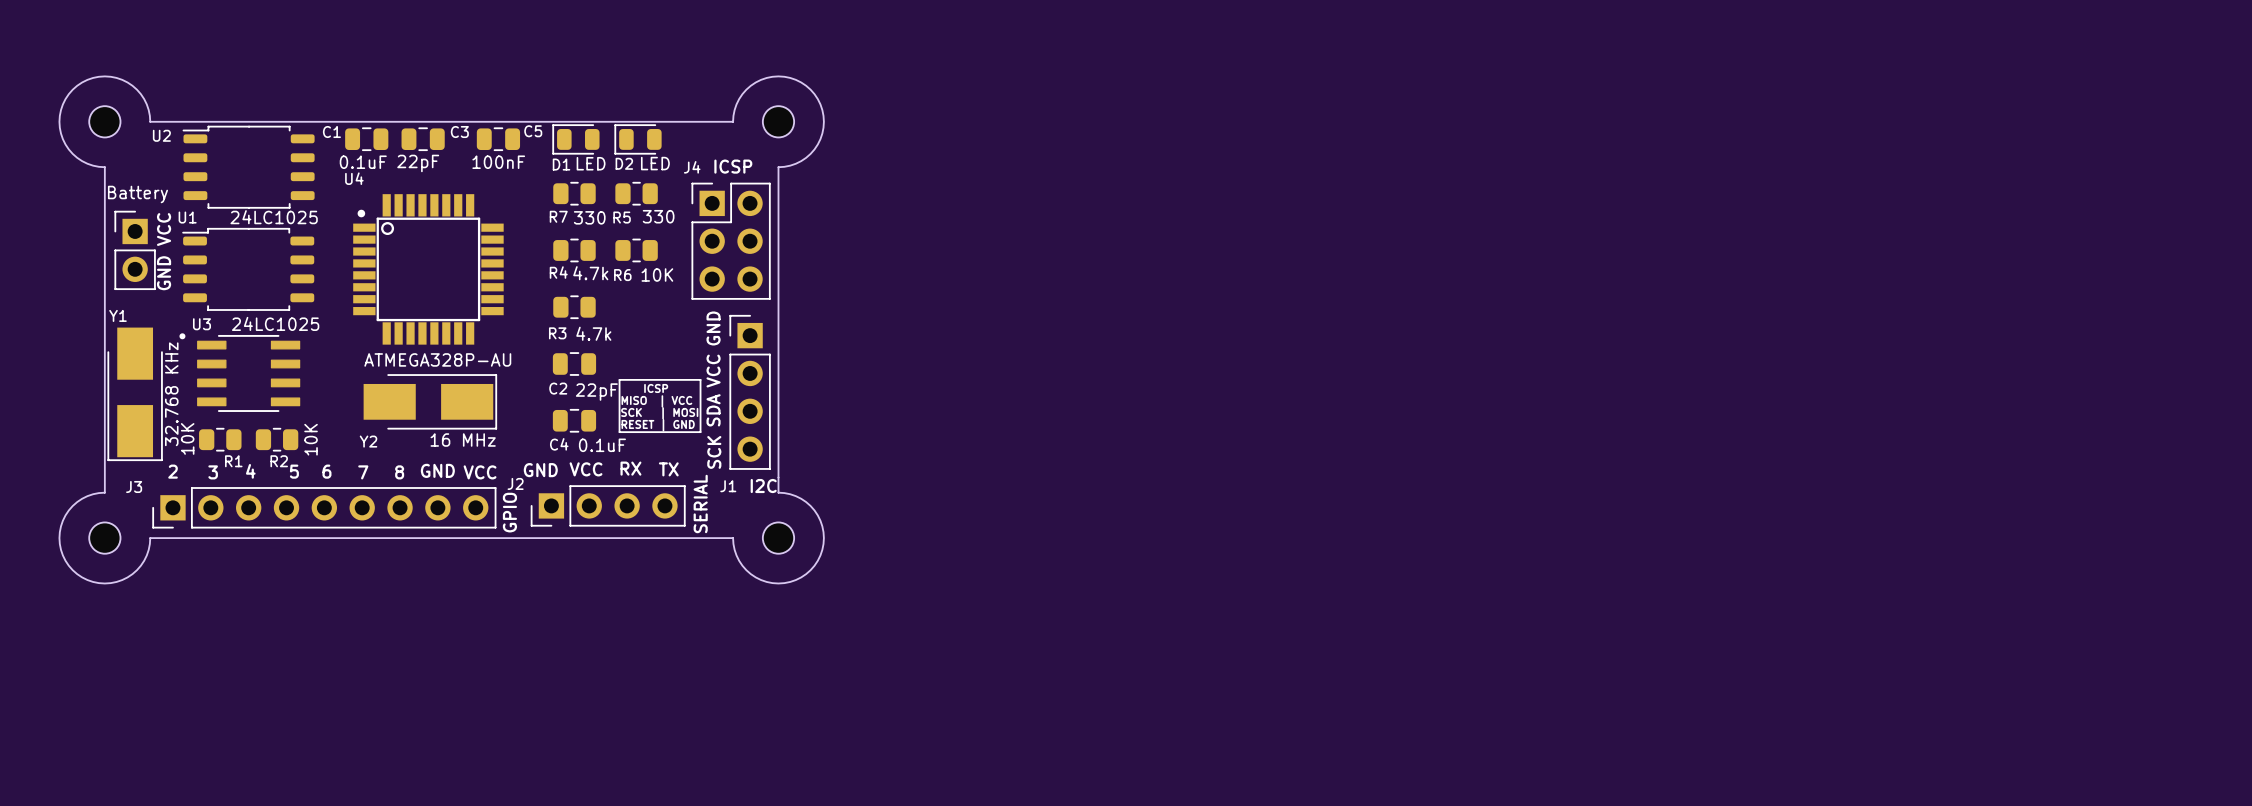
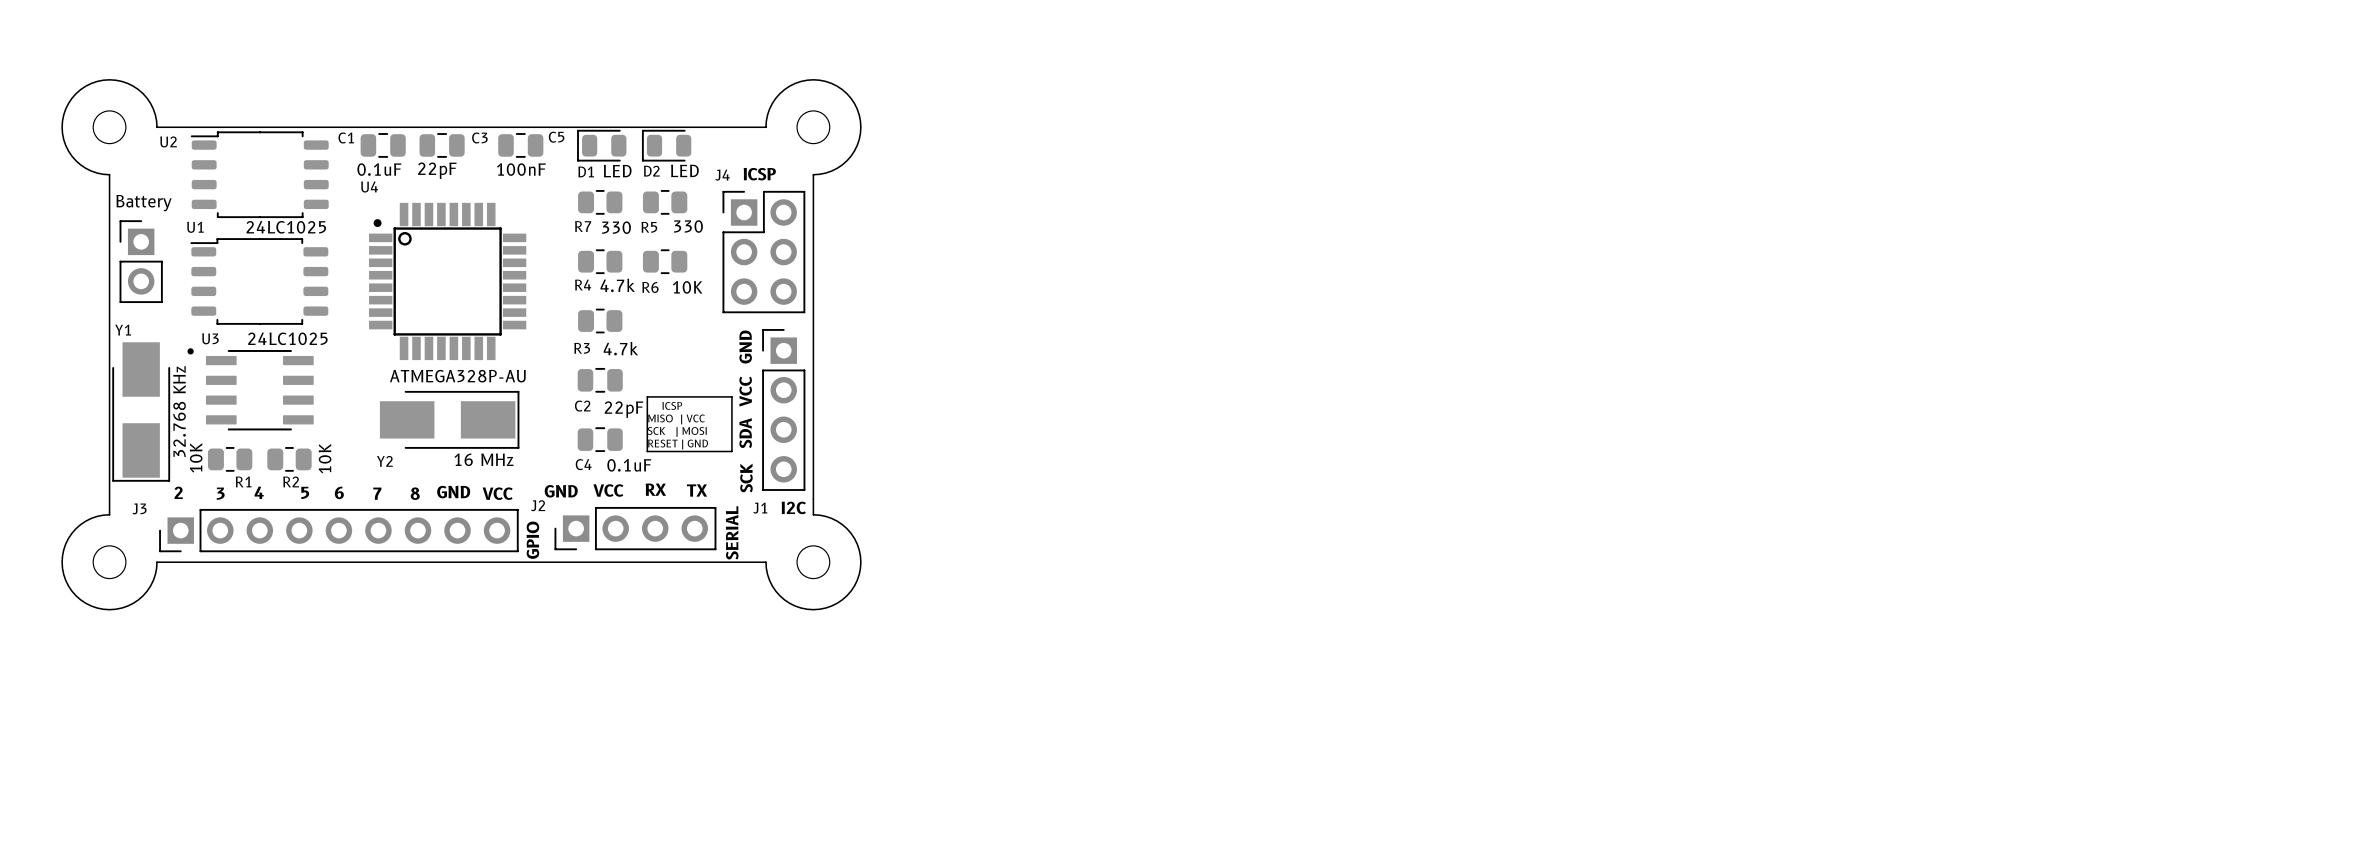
text: VCC (164, 229) -> none
text: GND (164, 273) -> none

